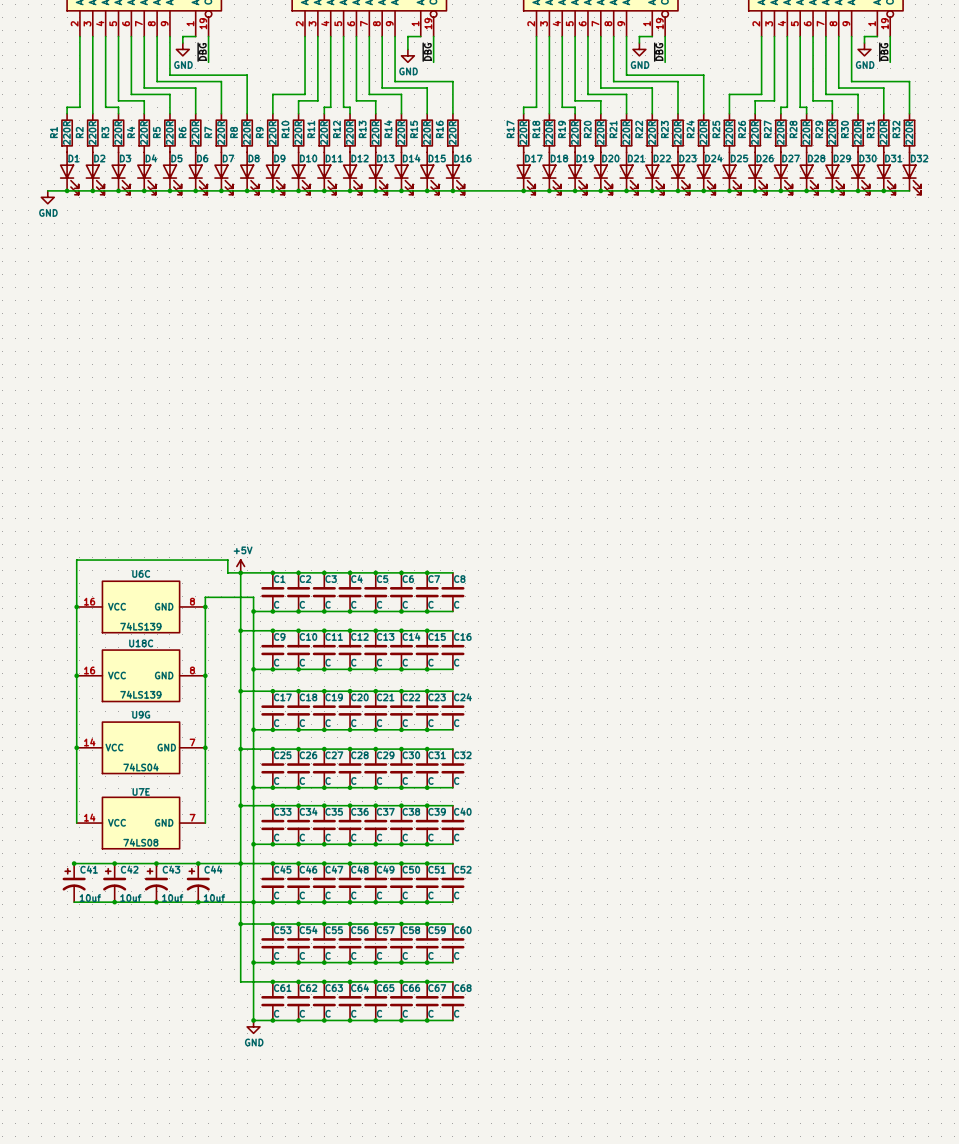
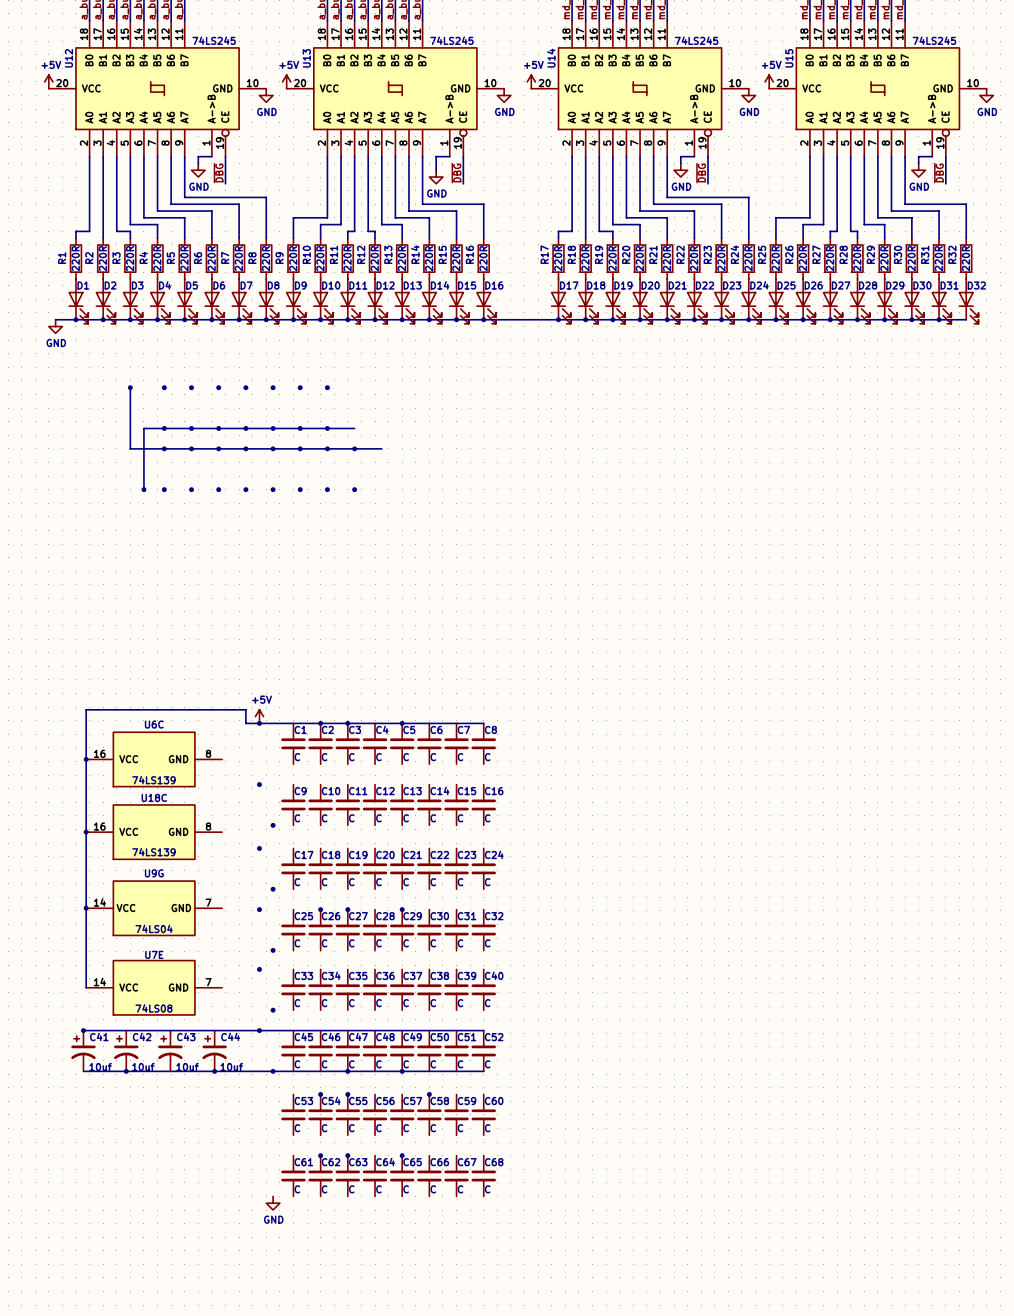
wire: none -> (130, 387) (130, 448) (381, 448)
junction: none -> (130, 387)
junction: none -> (164, 387)
junction: none -> (191, 387)
junction: none -> (218, 387)
junction: none -> (245, 387)
junction: none -> (273, 387)
junction: none -> (300, 387)
junction: none -> (327, 387)
junction: none -> (164, 428)
junction: none -> (191, 428)
junction: none -> (218, 428)
junction: none -> (245, 428)
junction: none -> (273, 428)
junction: none -> (300, 428)
junction: none -> (327, 428)
wire: none -> (354, 428) (143, 428) (143, 489)
junction: none -> (164, 448)
junction: none -> (191, 448)
junction: none -> (218, 448)
junction: none -> (245, 448)
junction: none -> (273, 448)
junction: none -> (300, 448)
junction: none -> (327, 448)
junction: none -> (354, 448)
junction: none -> (143, 489)
junction: none -> (164, 489)
junction: none -> (191, 489)
junction: none -> (218, 489)
junction: none -> (245, 489)
junction: none -> (273, 489)
junction: none -> (300, 489)
junction: none -> (327, 489)
junction: none -> (354, 489)
wire: (240, 572) (240, 981) (452, 981) -> none
junction: (272, 572) -> none
junction: (350, 572) -> none
junction: (401, 572) -> none
junction: (427, 572) -> none
junction: (205, 606) -> none
wire: (253, 611) (452, 611) -> none
junction: (253, 611) -> none
junction: (272, 611) -> none
junction: (298, 611) -> none
junction: (324, 611) -> none
junction: (350, 611) -> none
junction: (375, 611) -> none
junction: (401, 611) -> none
junction: (427, 611) -> none
wire: (240, 630) (452, 630) -> none
junction: (272, 630) -> none
junction: (298, 630) -> none
junction: (324, 630) -> none
junction: (350, 630) -> none
junction: (375, 630) -> none
junction: (401, 630) -> none
junction: (427, 630) -> none
wire: (253, 669) (452, 669) -> none
junction: (272, 669) -> none
junction: (298, 669) -> none
junction: (324, 669) -> none
junction: (350, 669) -> none
junction: (375, 669) -> none
junction: (401, 669) -> none
junction: (427, 669) -> none
junction: (205, 675) -> none
wire: (240, 691) (452, 691) -> none
junction: (272, 691) -> none
junction: (298, 691) -> none
junction: (324, 691) -> none
junction: (350, 691) -> none
junction: (375, 691) -> none
junction: (401, 691) -> none
junction: (427, 691) -> none
wire: (253, 729) (452, 729) -> none
junction: (272, 729) -> none
junction: (298, 729) -> none
junction: (324, 729) -> none
junction: (350, 729) -> none
junction: (375, 729) -> none
junction: (401, 729) -> none
junction: (427, 729) -> none
junction: (205, 747) -> none
wire: (240, 749) (452, 749) -> none
junction: (272, 749) -> none
junction: (350, 749) -> none
junction: (401, 749) -> none
junction: (427, 749) -> none
wire: (253, 787) (452, 787) -> none
junction: (272, 787) -> none
junction: (298, 787) -> none
junction: (324, 787) -> none
junction: (350, 787) -> none
junction: (375, 787) -> none
junction: (401, 787) -> none
junction: (427, 787) -> none
wire: (240, 805) (452, 805) -> none
junction: (272, 805) -> none
junction: (298, 805) -> none
junction: (324, 805) -> none
junction: (350, 805) -> none
junction: (375, 805) -> none
junction: (401, 805) -> none
junction: (427, 805) -> none
wire: (205, 823) (205, 597) (253, 597) (253, 1020) (452, 1020) -> none
wire: (253, 844) (452, 844) -> none
junction: (272, 844) -> none
junction: (298, 844) -> none
junction: (324, 844) -> none
junction: (350, 844) -> none
junction: (375, 844) -> none
junction: (401, 844) -> none
junction: (427, 844) -> none
junction: (114, 863) -> none
junction: (156, 863) -> none
junction: (198, 863) -> none
junction: (272, 863) -> none
junction: (298, 863) -> none
junction: (324, 863) -> none
junction: (350, 863) -> none
junction: (375, 863) -> none
junction: (401, 863) -> none
junction: (427, 863) -> none
junction: (156, 902) -> none
junction: (272, 902) -> none
junction: (298, 902) -> none
junction: (350, 902) -> none
junction: (401, 902) -> none
junction: (427, 902) -> none
wire: (240, 924) (452, 924) -> none
junction: (240, 924) -> none
junction: (272, 924) -> none
junction: (350, 924) -> none
junction: (375, 924) -> none
junction: (427, 924) -> none
wire: (253, 962) (452, 962) -> none
junction: (253, 962) -> none
junction: (272, 962) -> none
junction: (298, 962) -> none
junction: (324, 962) -> none
junction: (350, 962) -> none
junction: (375, 962) -> none
junction: (401, 962) -> none
junction: (427, 962) -> none
junction: (272, 981) -> none
junction: (350, 981) -> none
junction: (401, 981) -> none
junction: (427, 981) -> none
junction: (253, 1020) -> none
junction: (272, 1020) -> none
junction: (298, 1020) -> none
junction: (324, 1020) -> none
junction: (350, 1020) -> none
junction: (375, 1020) -> none
junction: (401, 1020) -> none
junction: (427, 1020) -> none

